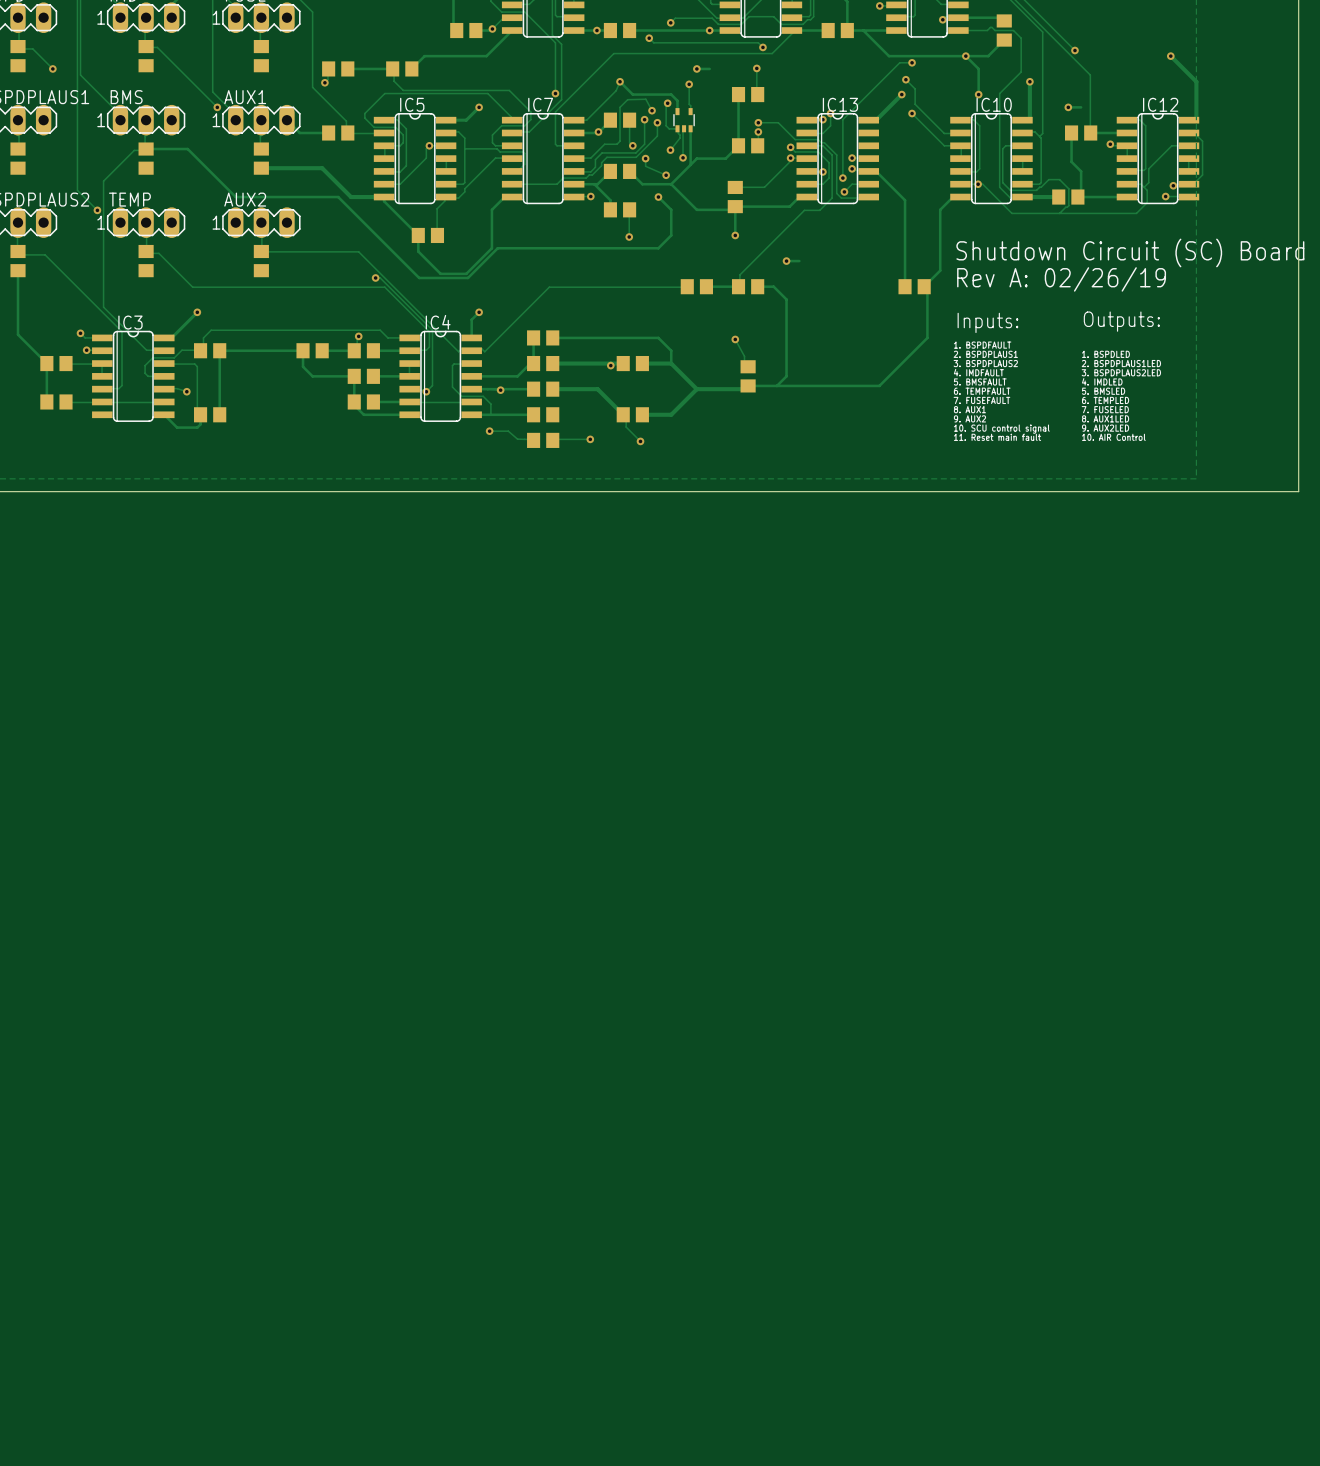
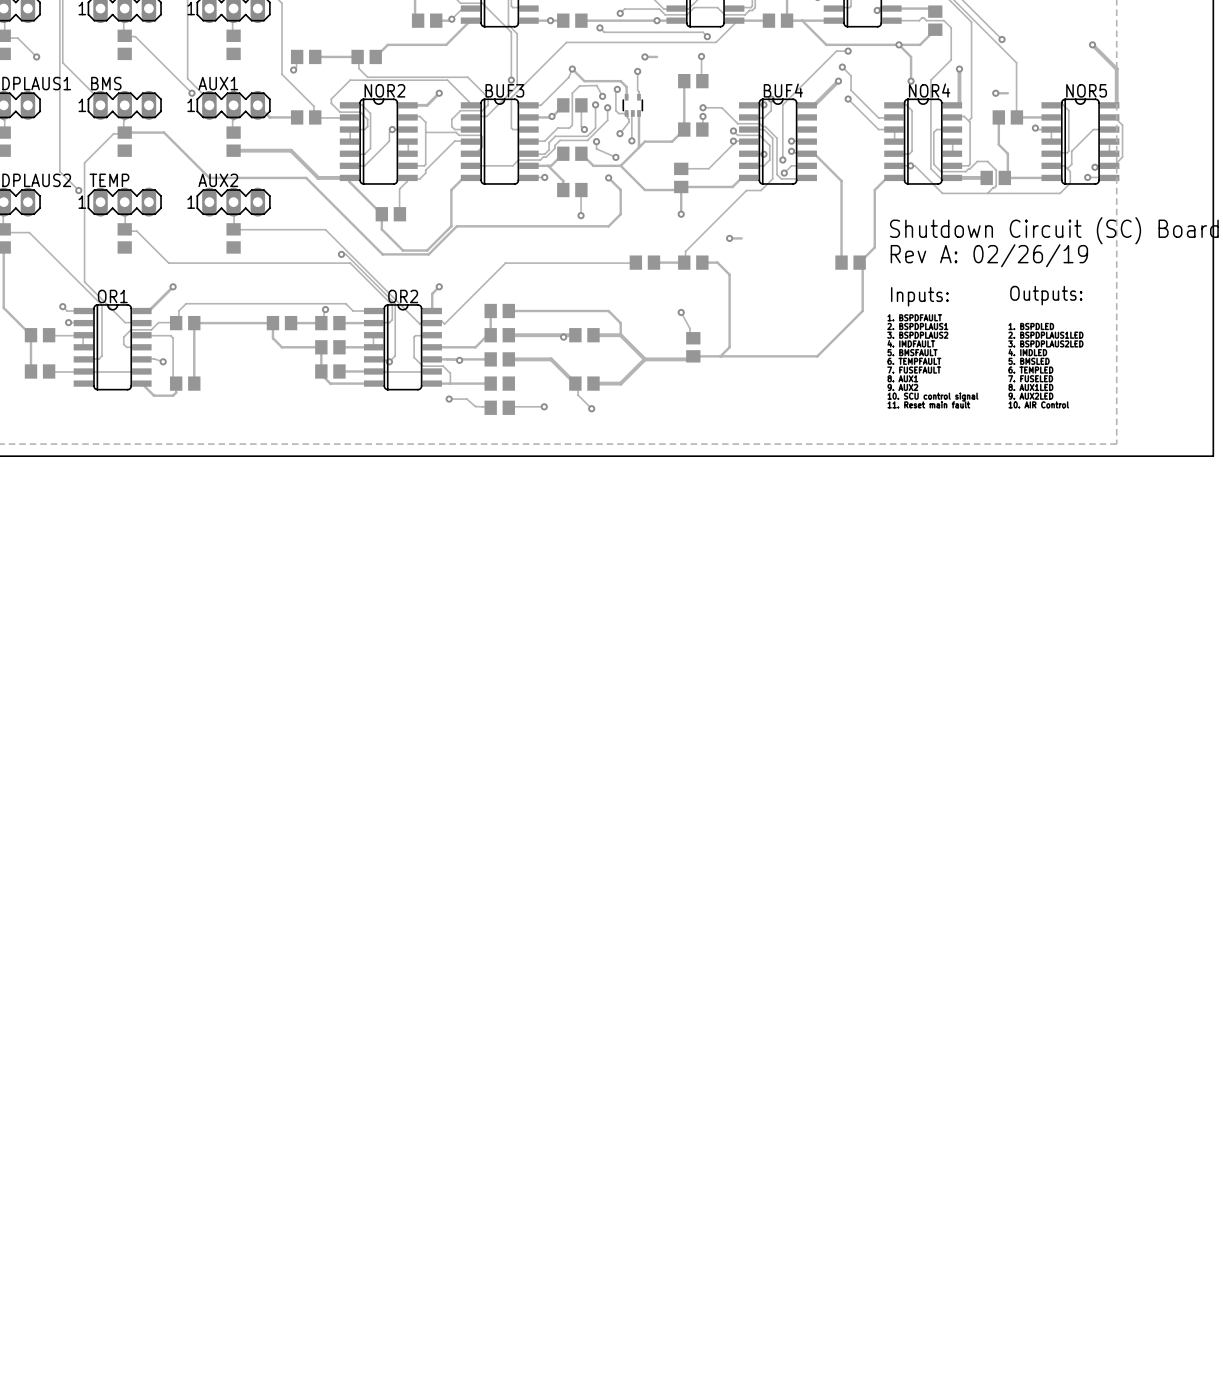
IC5 name: IC5 (412, 104) -> NOR2 (384, 90)
IC7 name: IC7 (540, 104) -> BUF3 (504, 90)
IC13 name: IC13 (840, 104) -> BUF4 (783, 90)
IC10 name: IC10 (994, 104) -> NOR4 (929, 90)
IC12 name: IC12 (1160, 104) -> NOR5 (1086, 90)
IC3 name: IC3 (130, 322) -> OR1 (112, 296)
IC4 name: IC4 (438, 322) -> OR2 (403, 296)

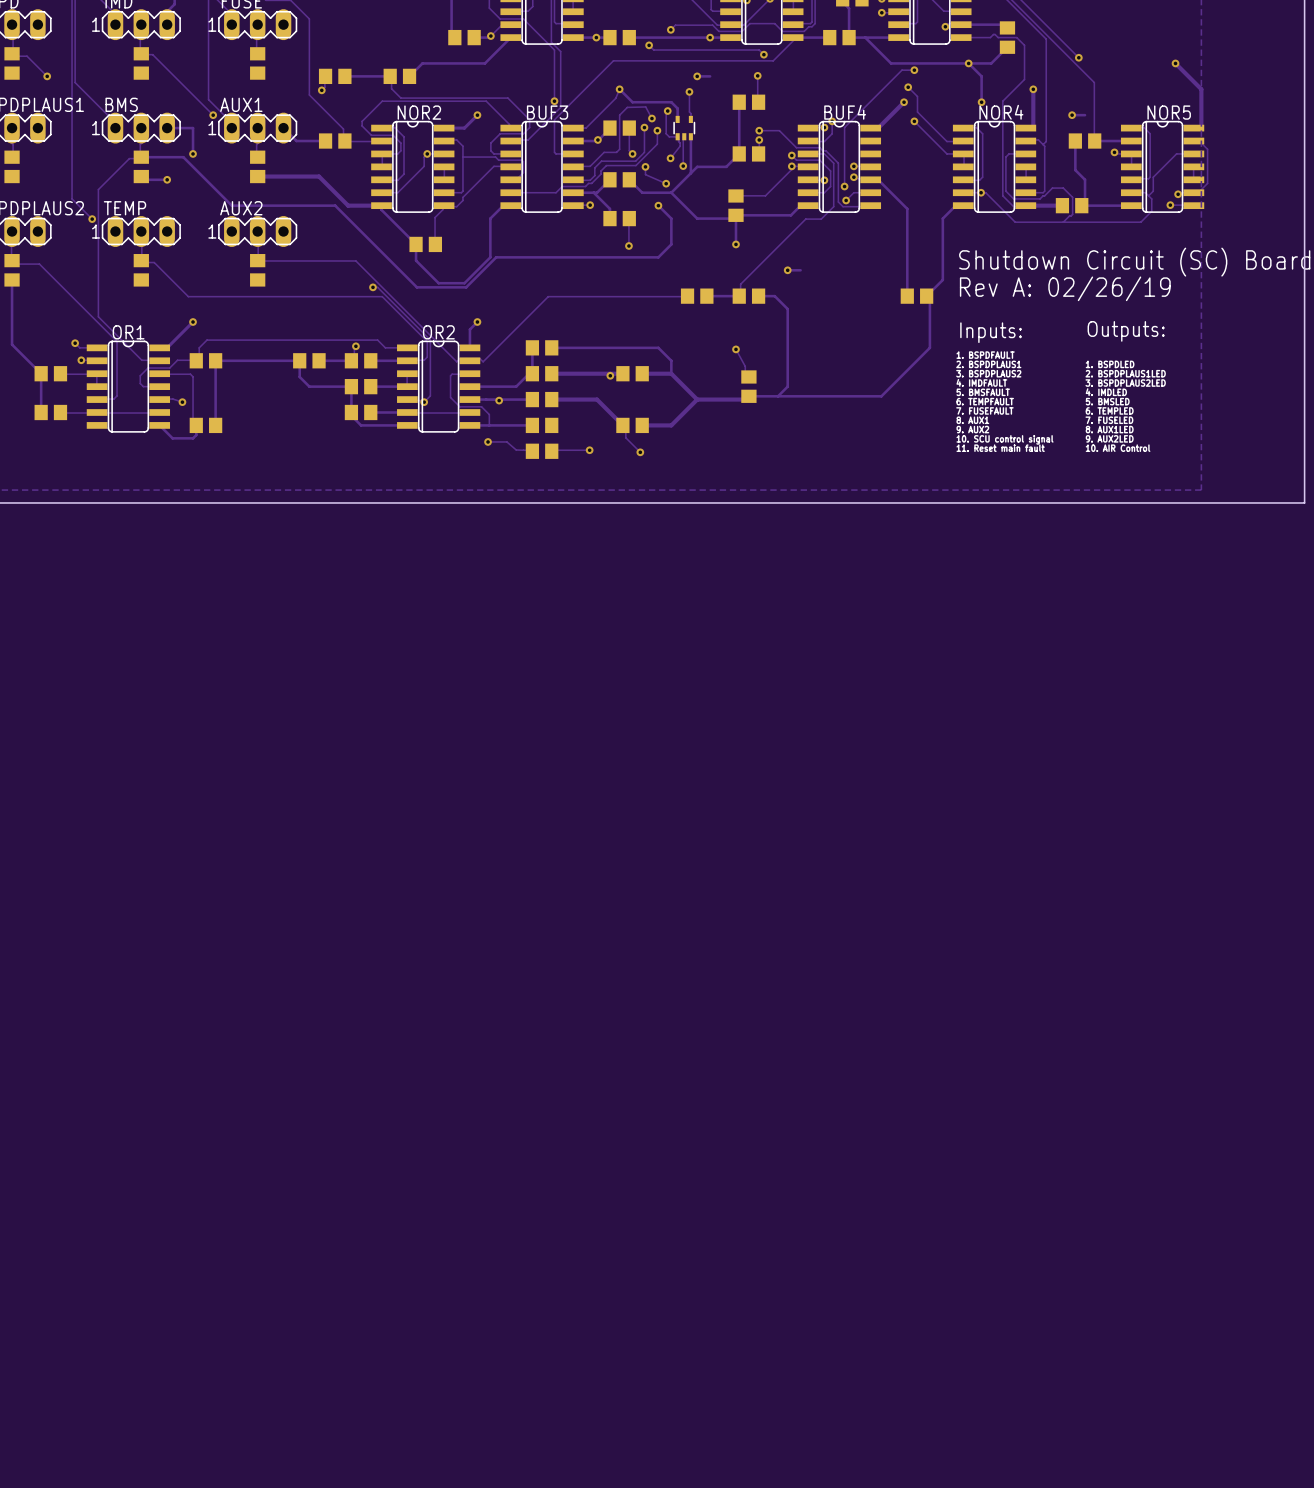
track: none -> (167, 128) (193, 128) (193, 153)
via: none -> (193, 153)
track: none -> (141, 176) (144, 179) (167, 179)
via: none -> (167, 179)

